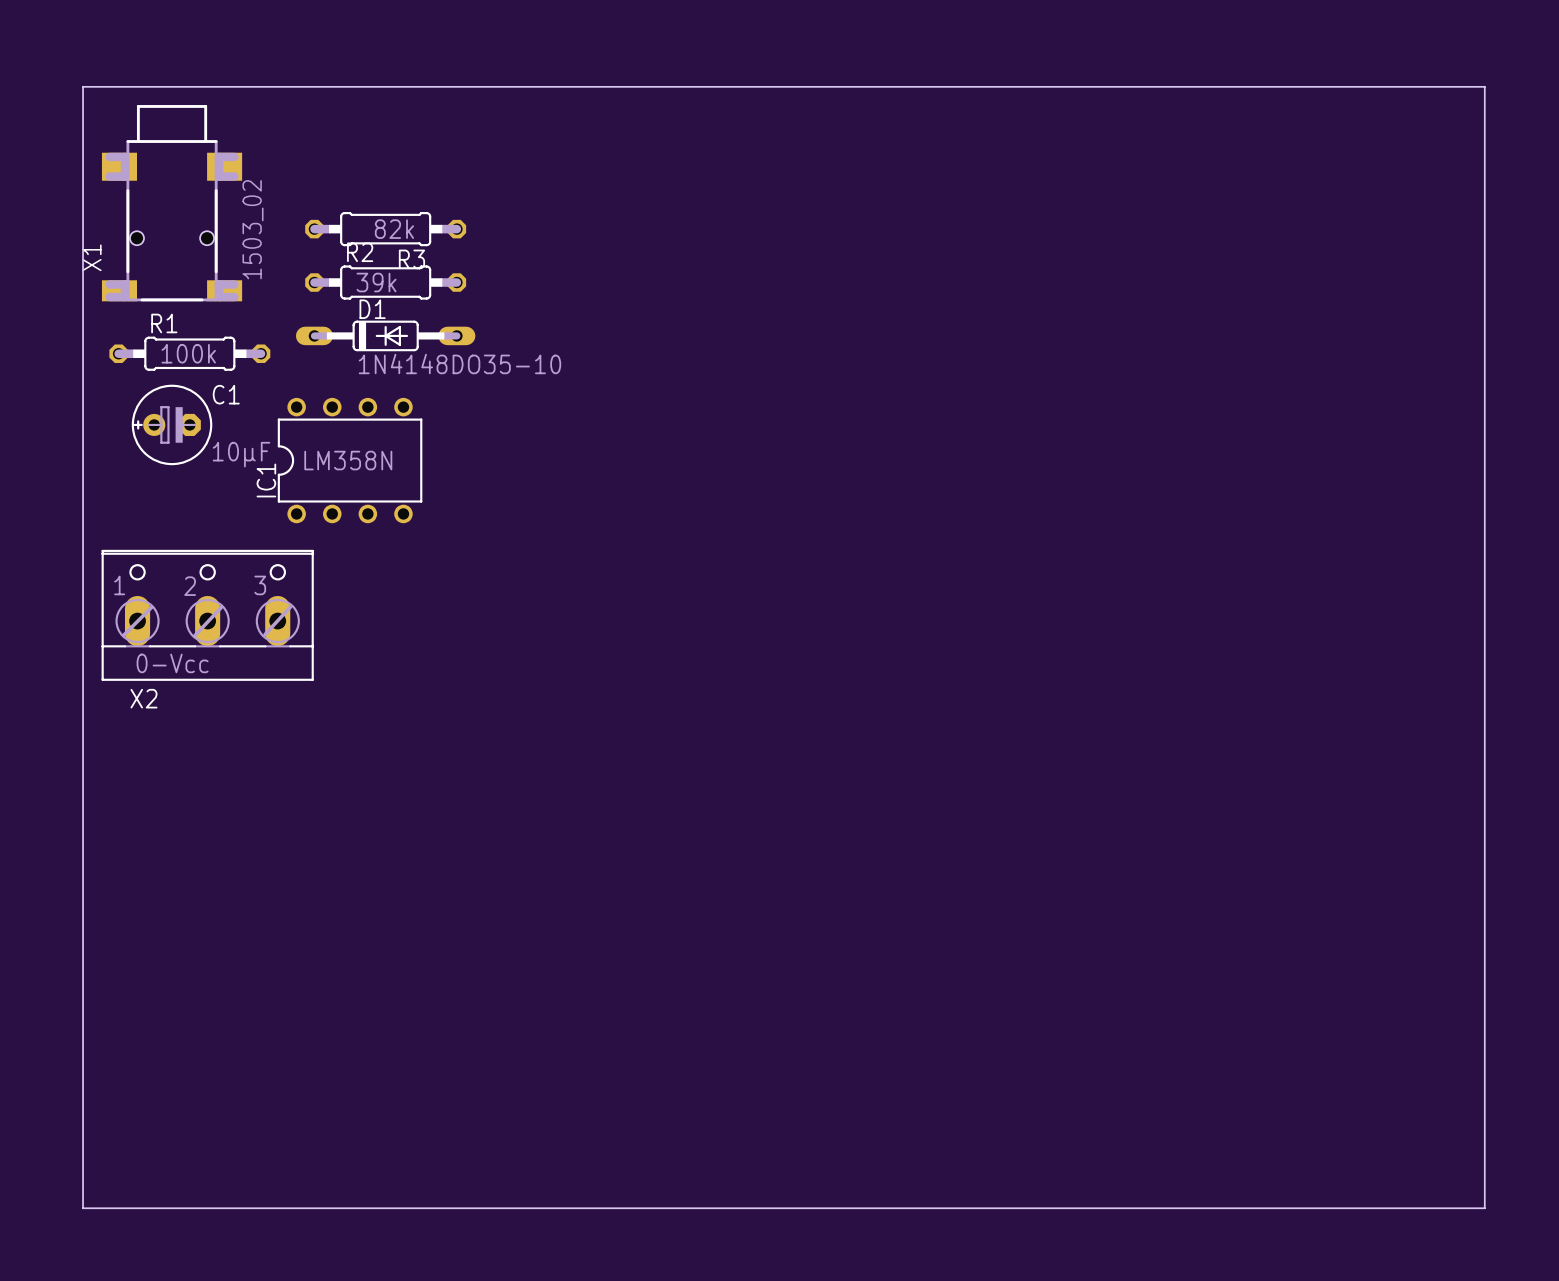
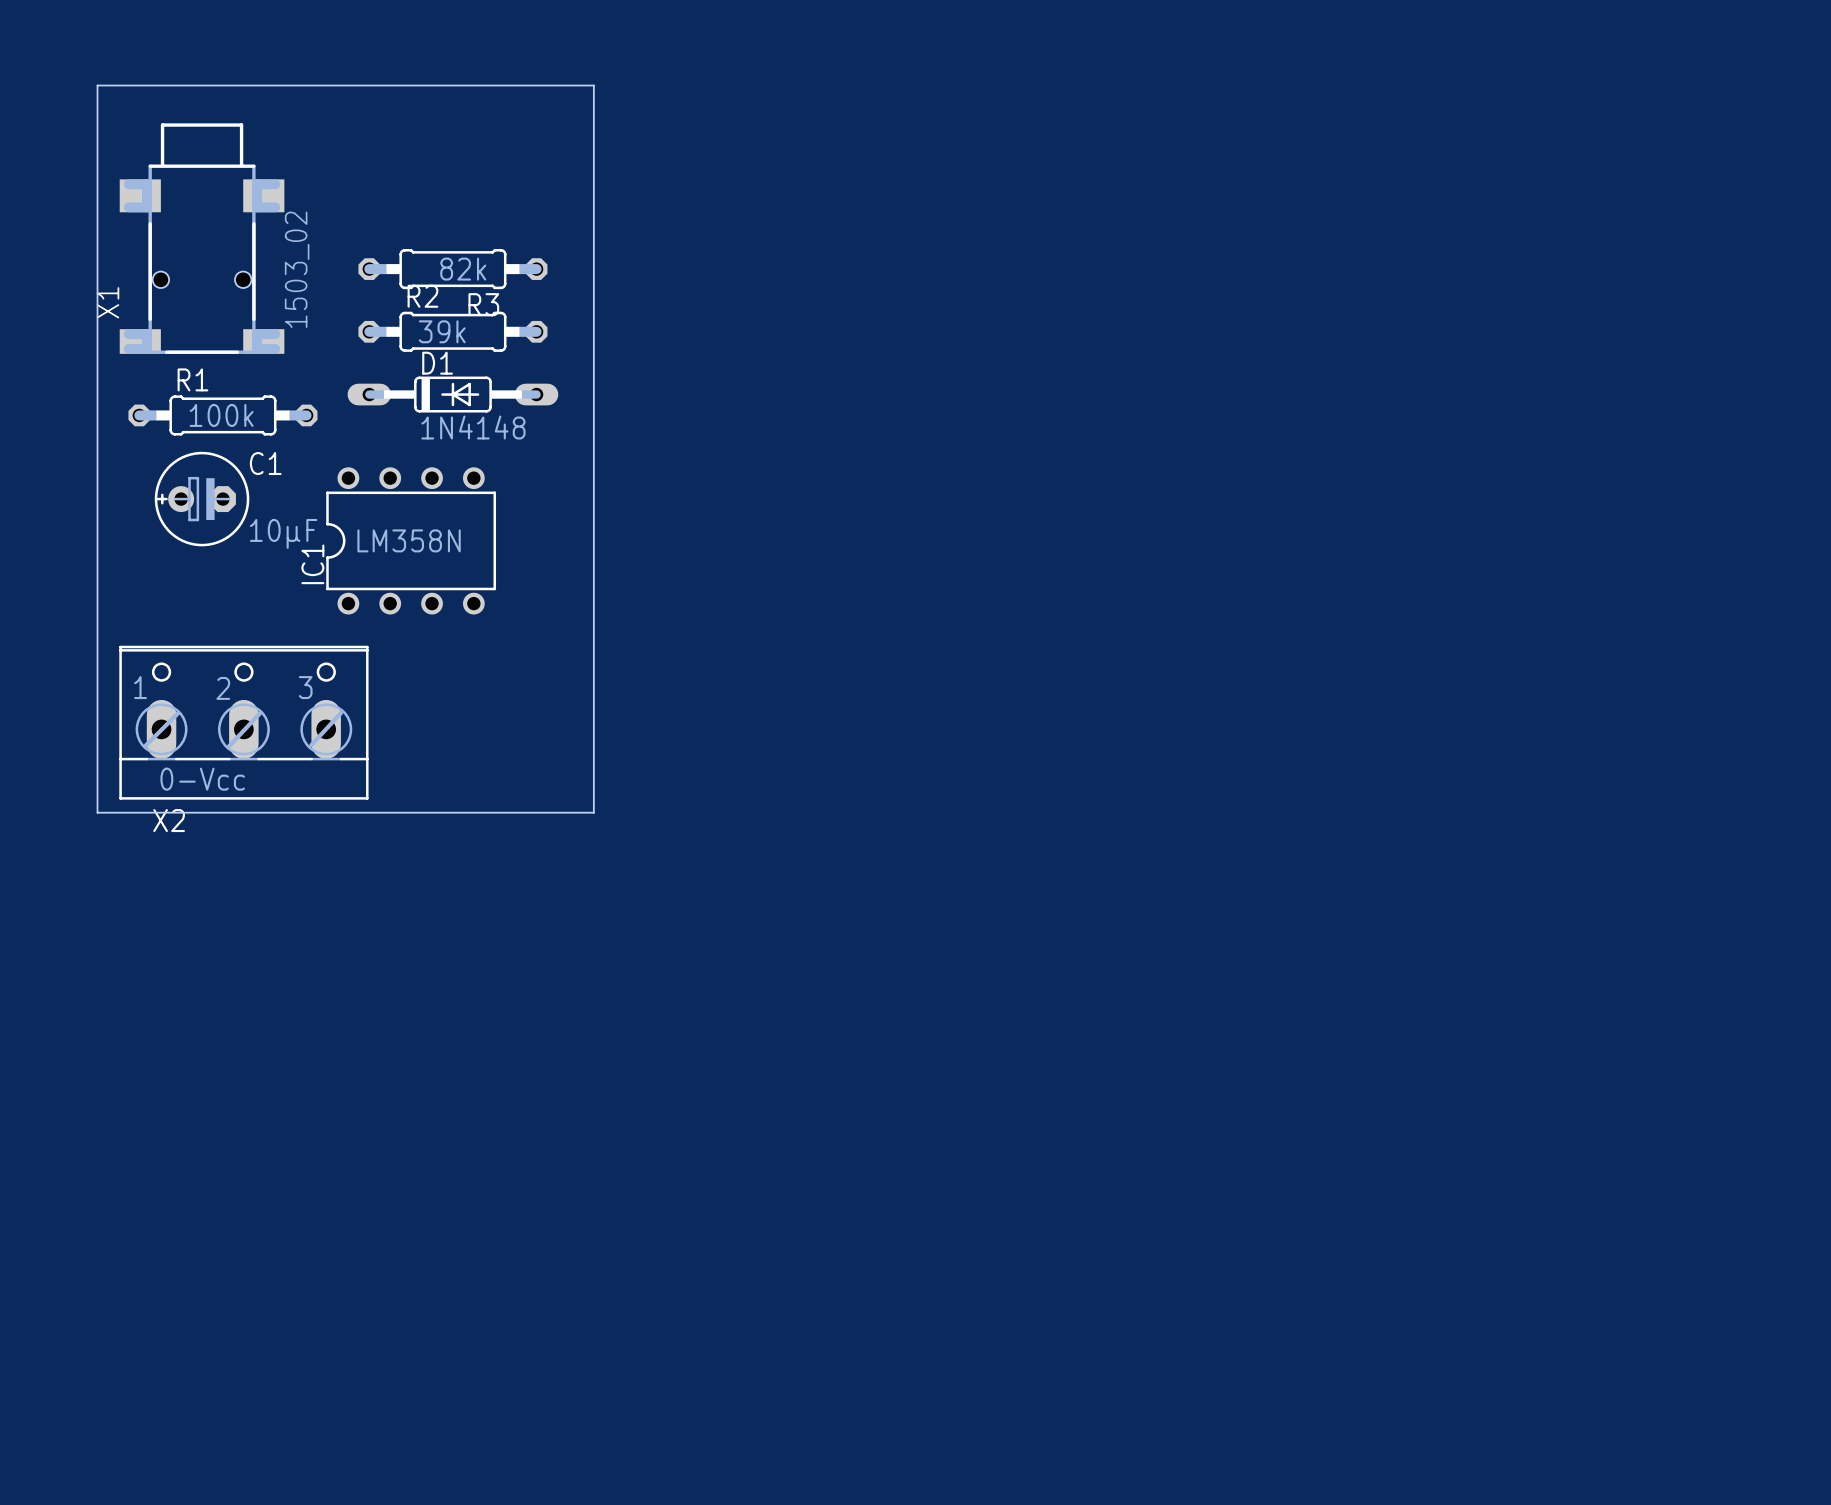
board edge: (83, 86) (1484, 86) (1484, 1208) (83, 1208) (83, 691) -> (97, 101) (97, 85) (593, 85) (593, 812) (97, 812)
D1 value: 1N4148DO35-10 (459, 363) -> 1N4148 (473, 427)

